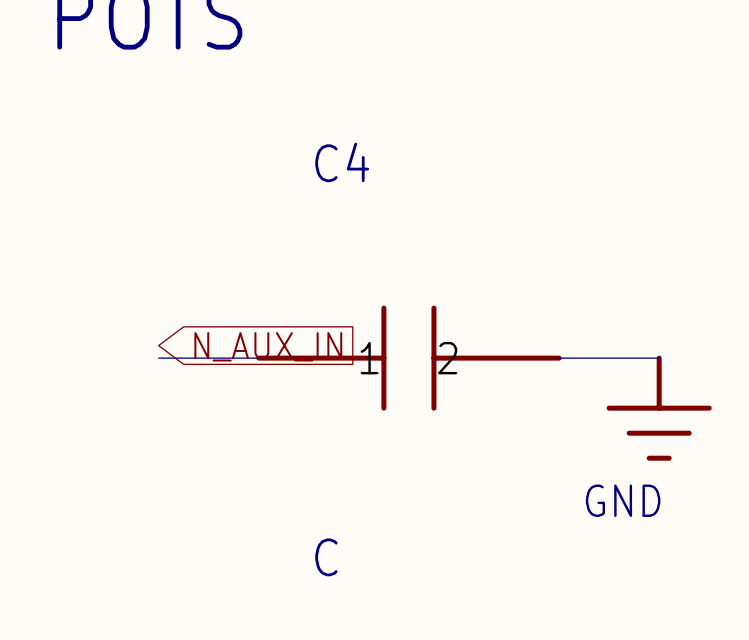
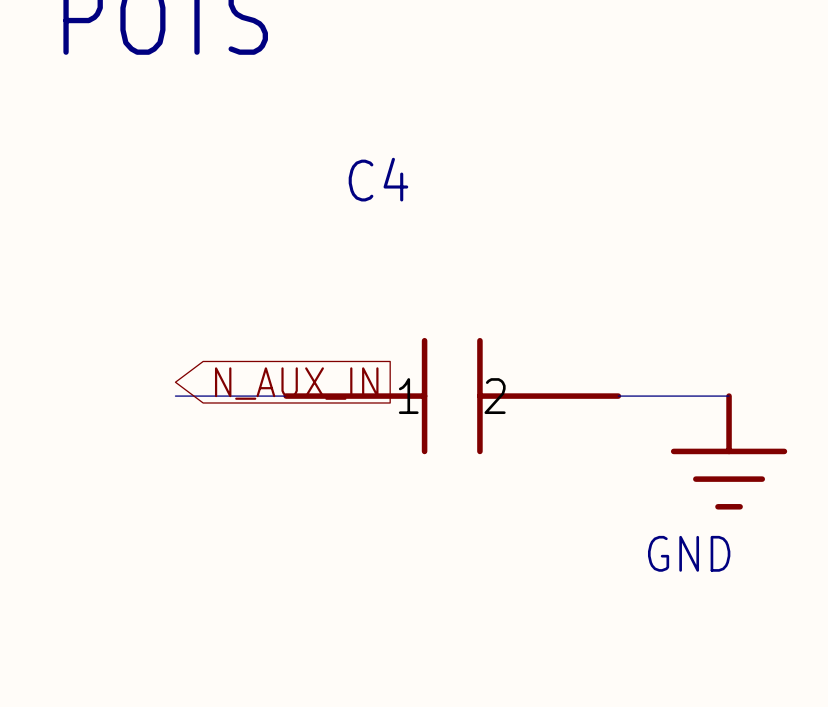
C4 value: C (326, 557) -> none

